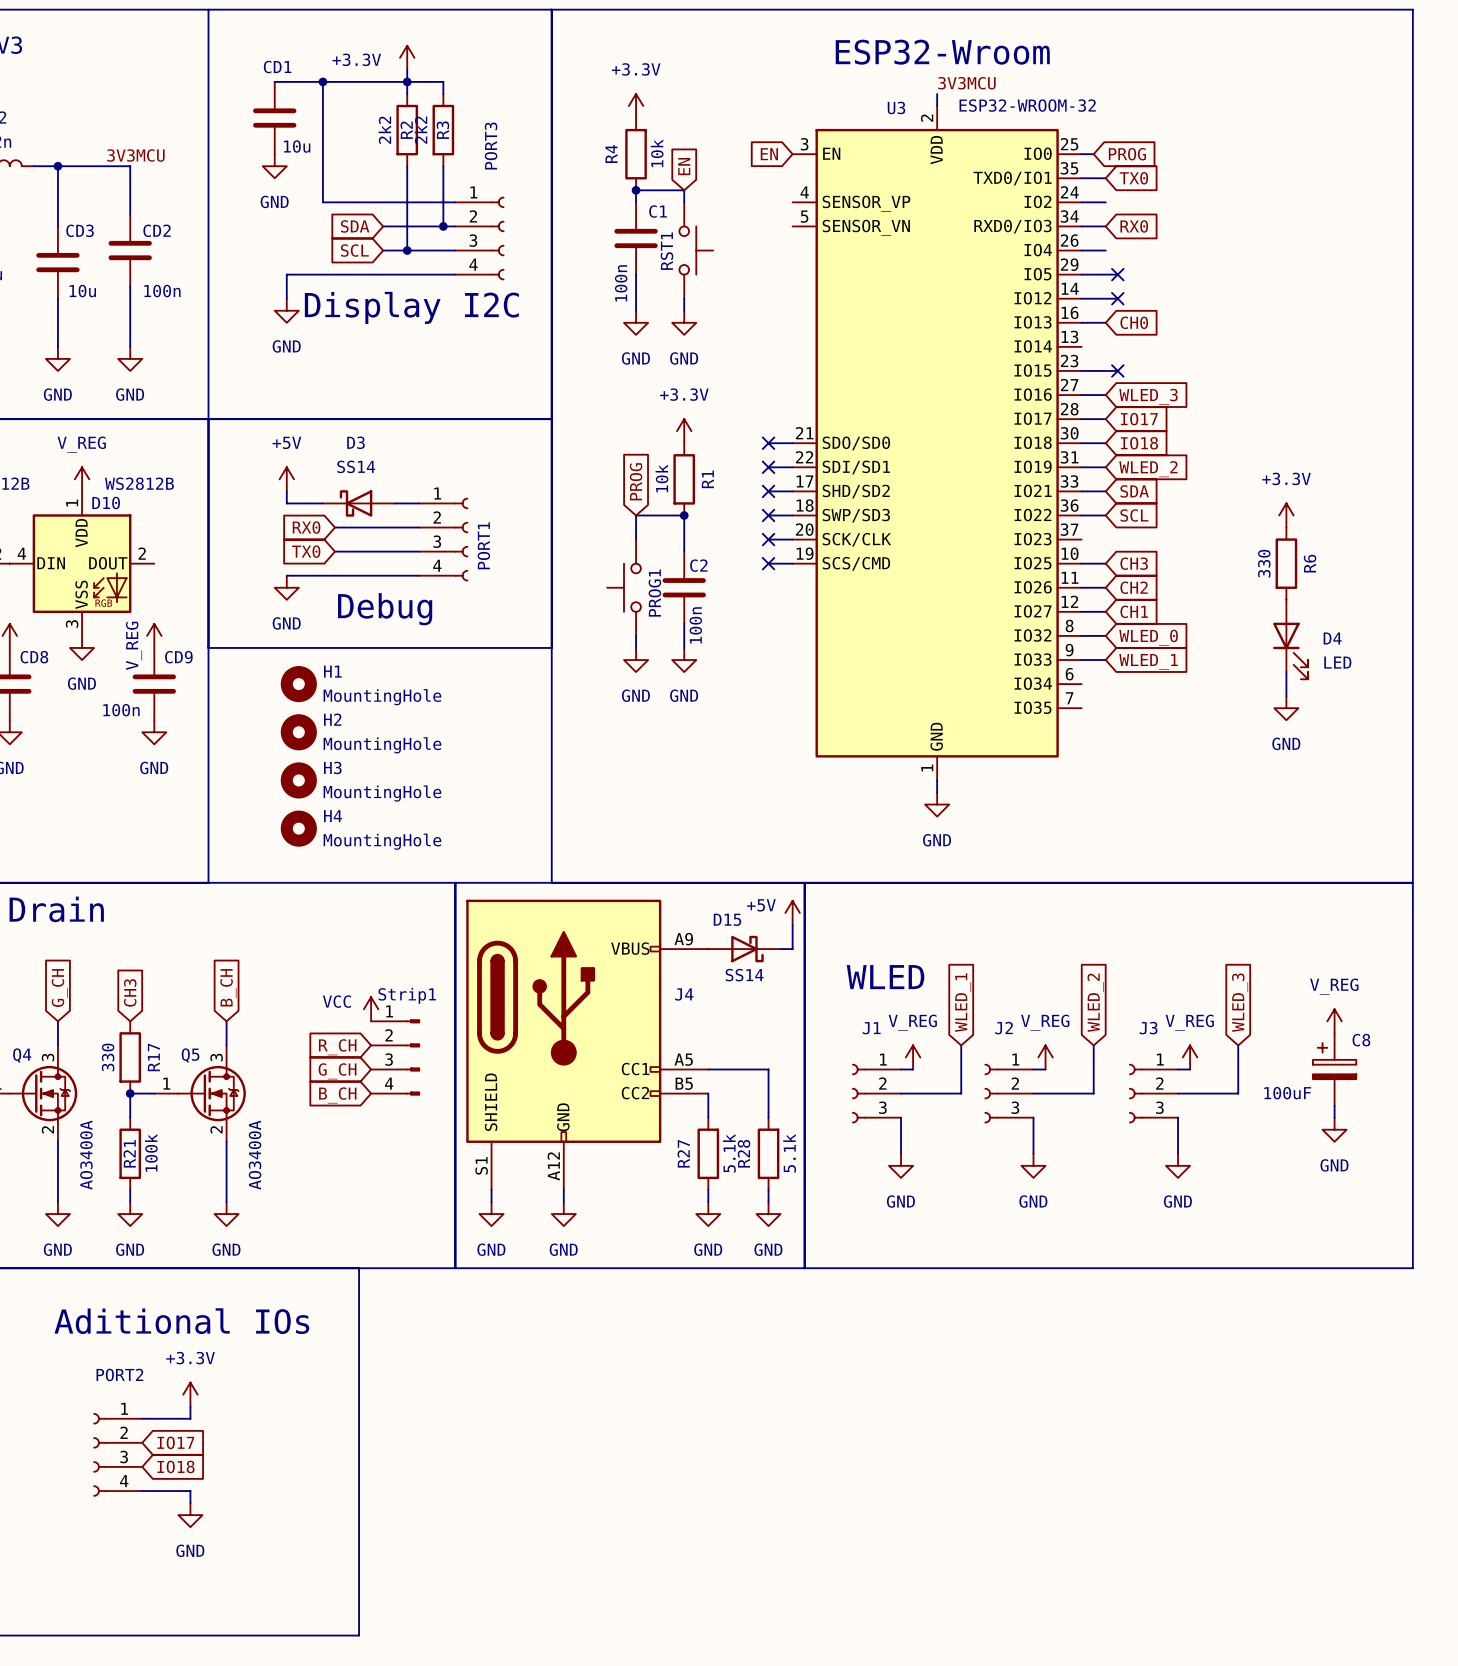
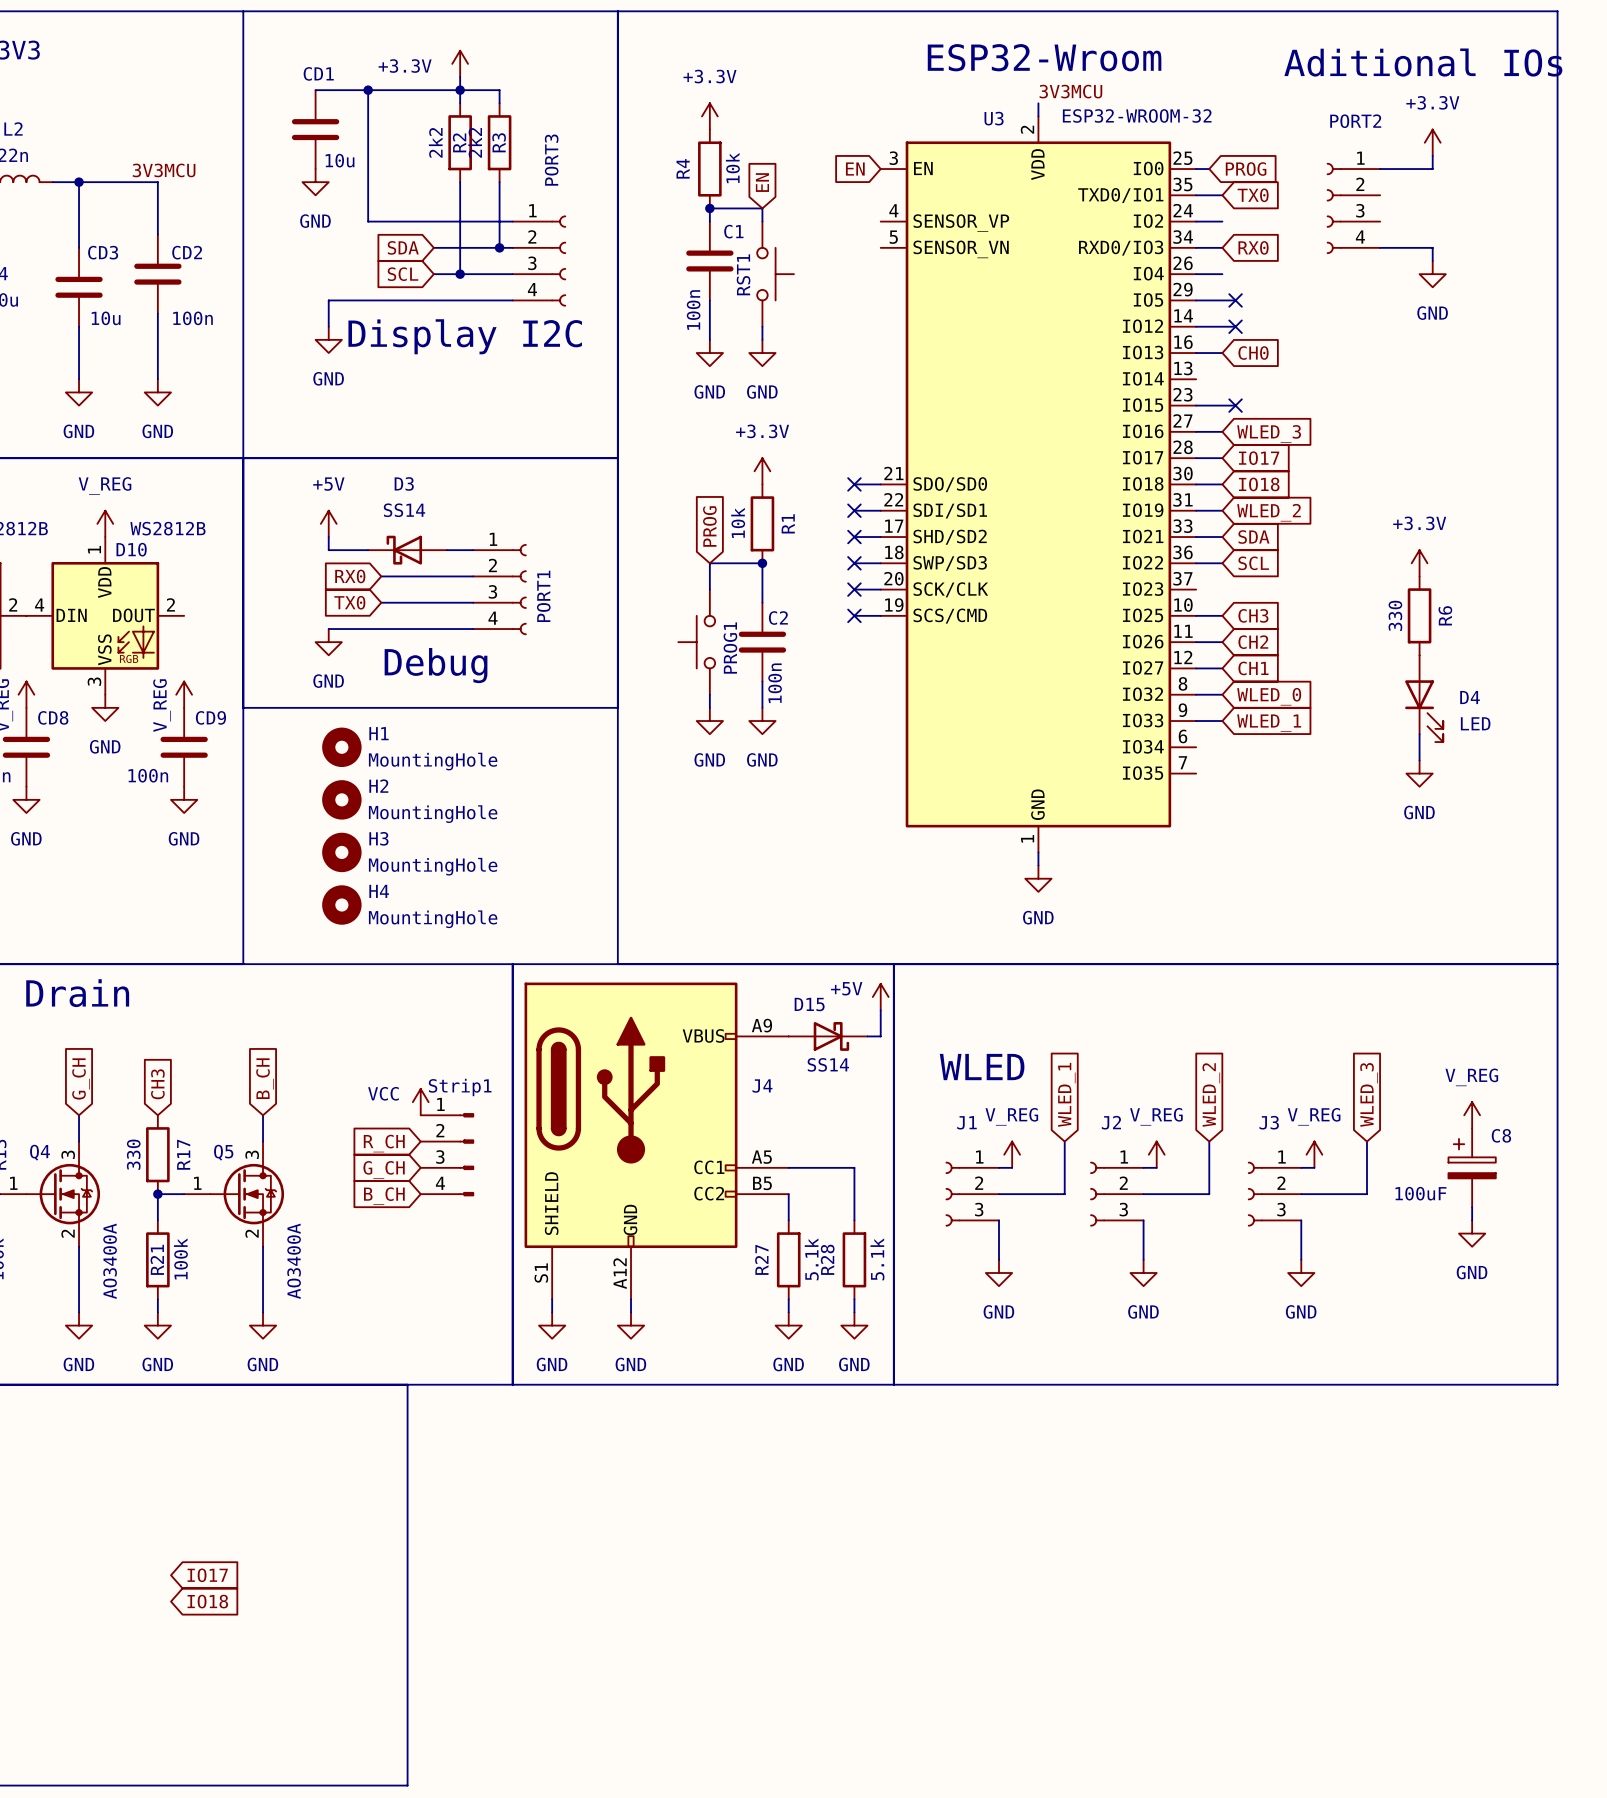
text: none -> Aditional IOs (1423, 62)
power symbol: none -> +3.3V (1432, 142)
wire: none -> (1432, 155) (1432, 169) (1380, 169)
wire: none -> (1380, 247) (1432, 247) (1432, 261)
power symbol: none -> GND (1432, 274)
text: Aditional IOs (181, 1321) -> none
power symbol: +3.3V (190, 1394) -> none
wire: (190, 1406) (190, 1418) (142, 1418) -> none
PORT2 position: (117, 1454) -> (1353, 208)
wire: (142, 1491) (190, 1491) (190, 1503) -> none
power symbol: GND (190, 1515) -> none

